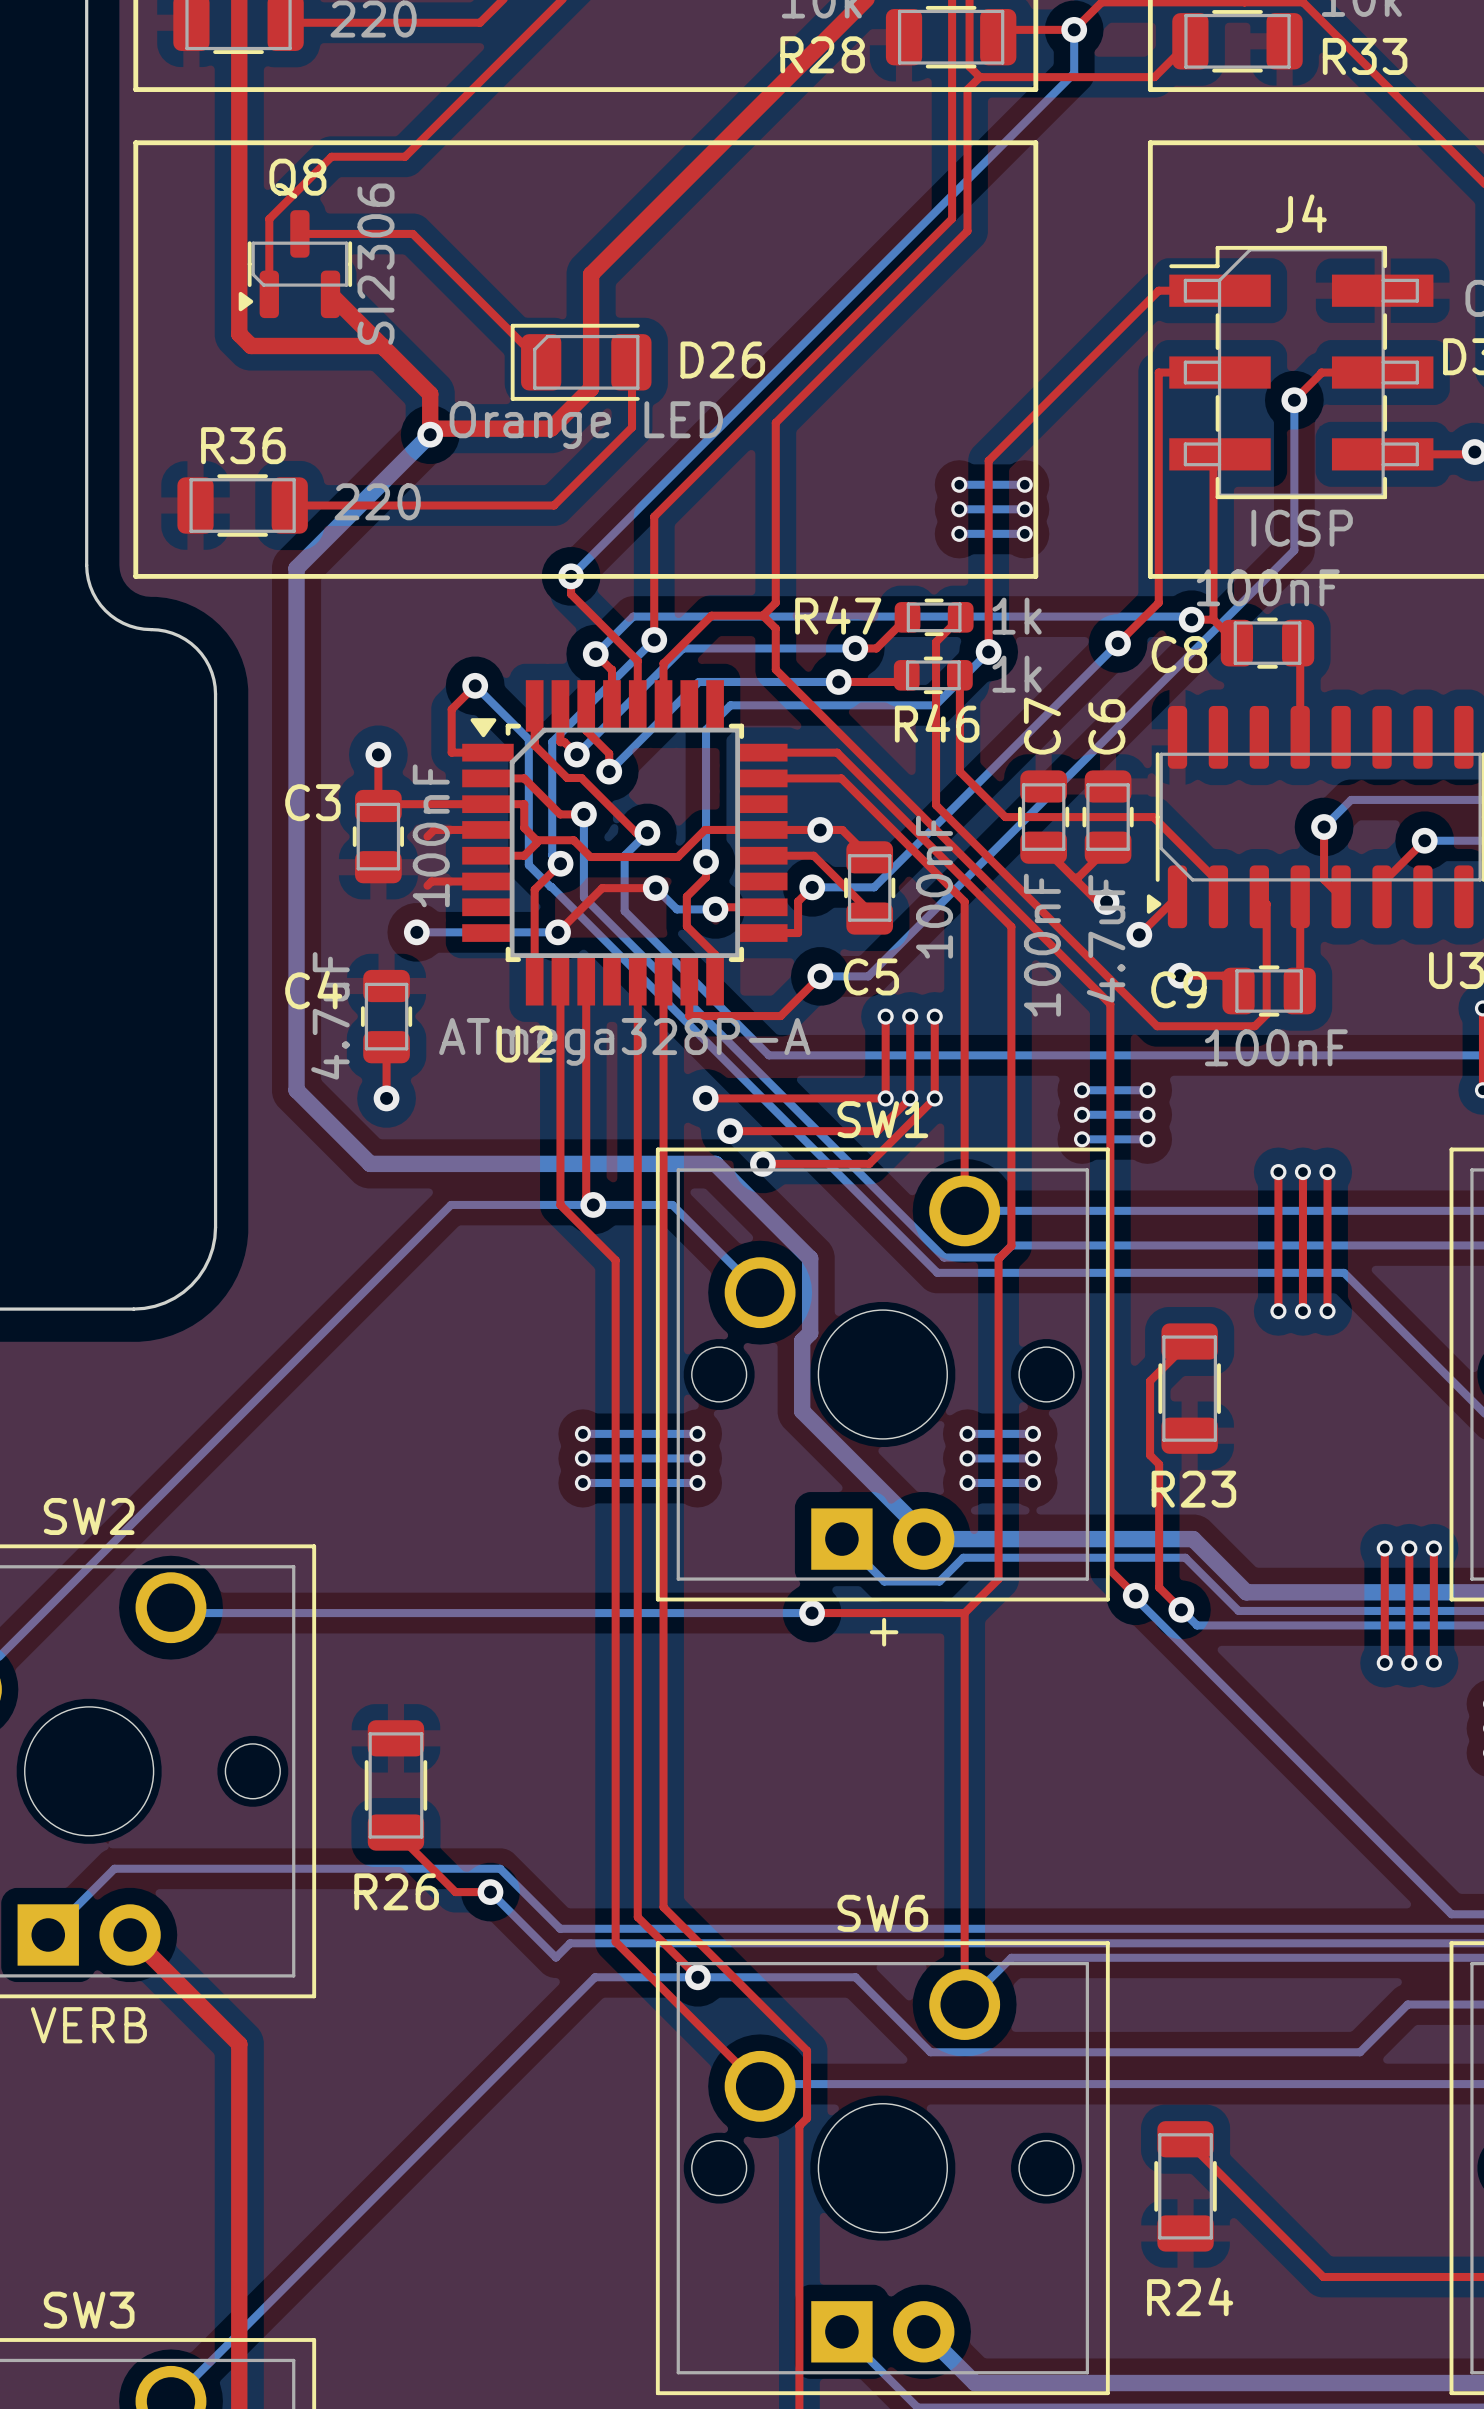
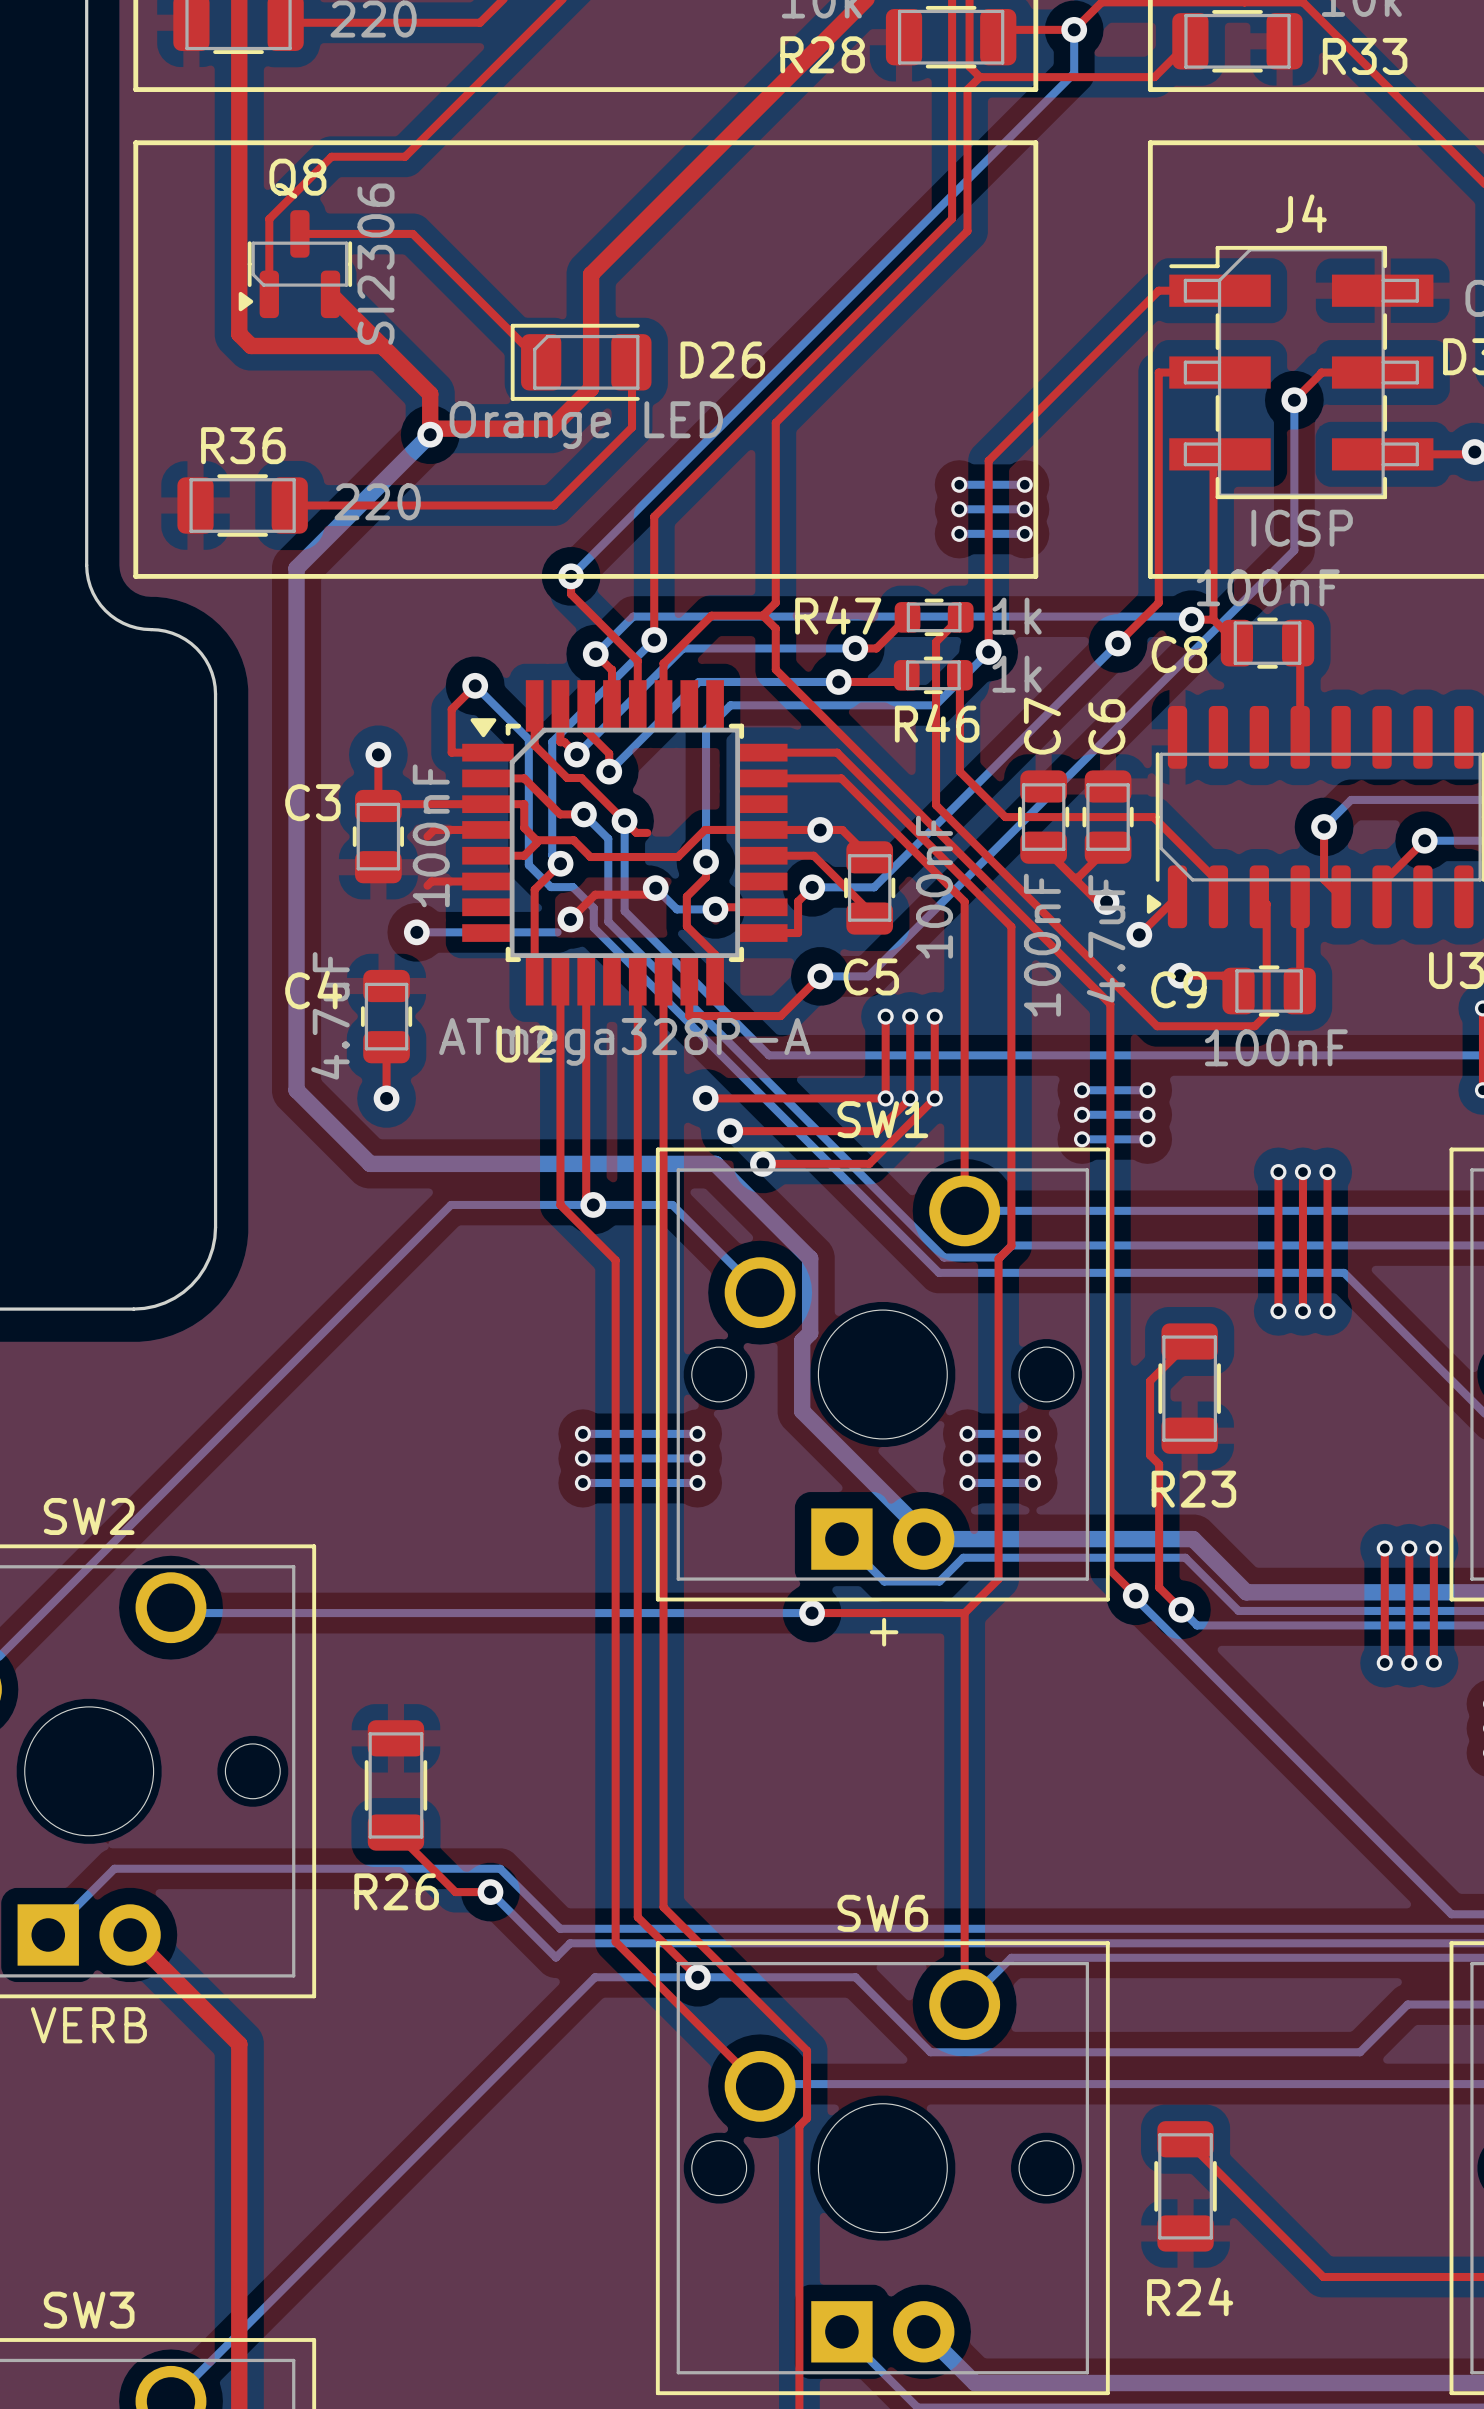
bottom track: (583, 814) (583, 897) (608, 921) -> (583, 814) (608, 838) (608, 921)
bottom track: (647, 832) (624, 855) -> (624, 821) (624, 855)
via position: (647, 832) -> (624, 821)
bottom track: (551, 886) (938, 1272) -> (551, 886) (572, 887) (593, 908) (593, 927) (938, 1272)
top track: (655, 888) (602, 888) (558, 932) -> none
top track: none -> (648, 894) (595, 894) (570, 919)
via position: (558, 932) -> (570, 919)

